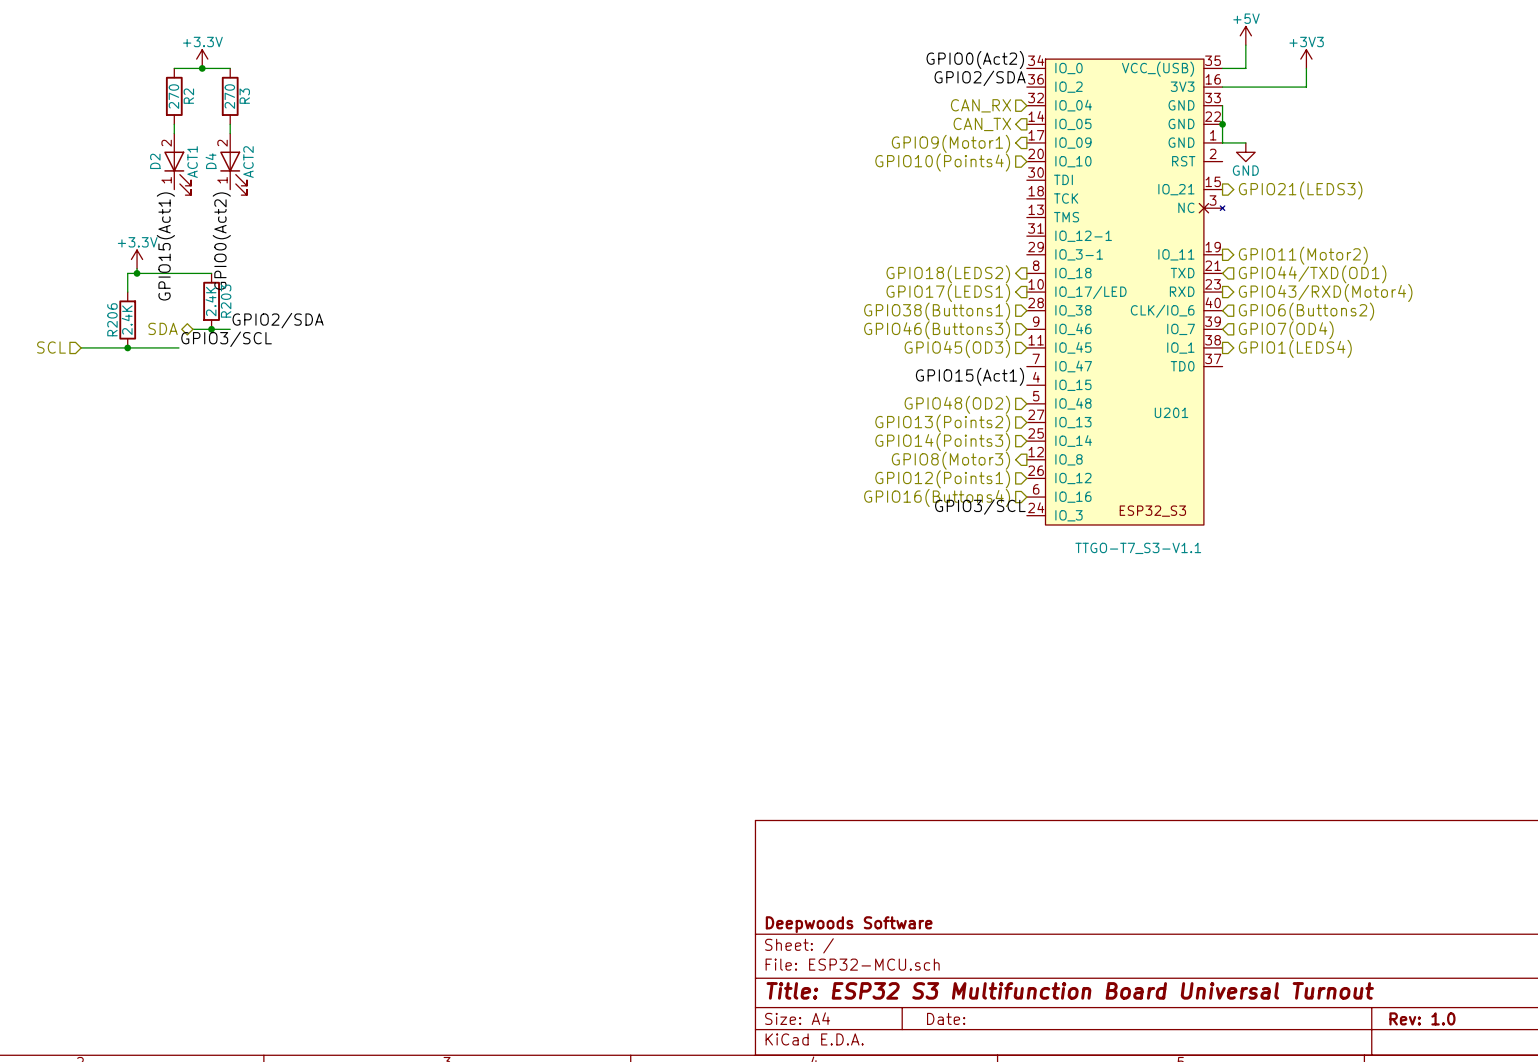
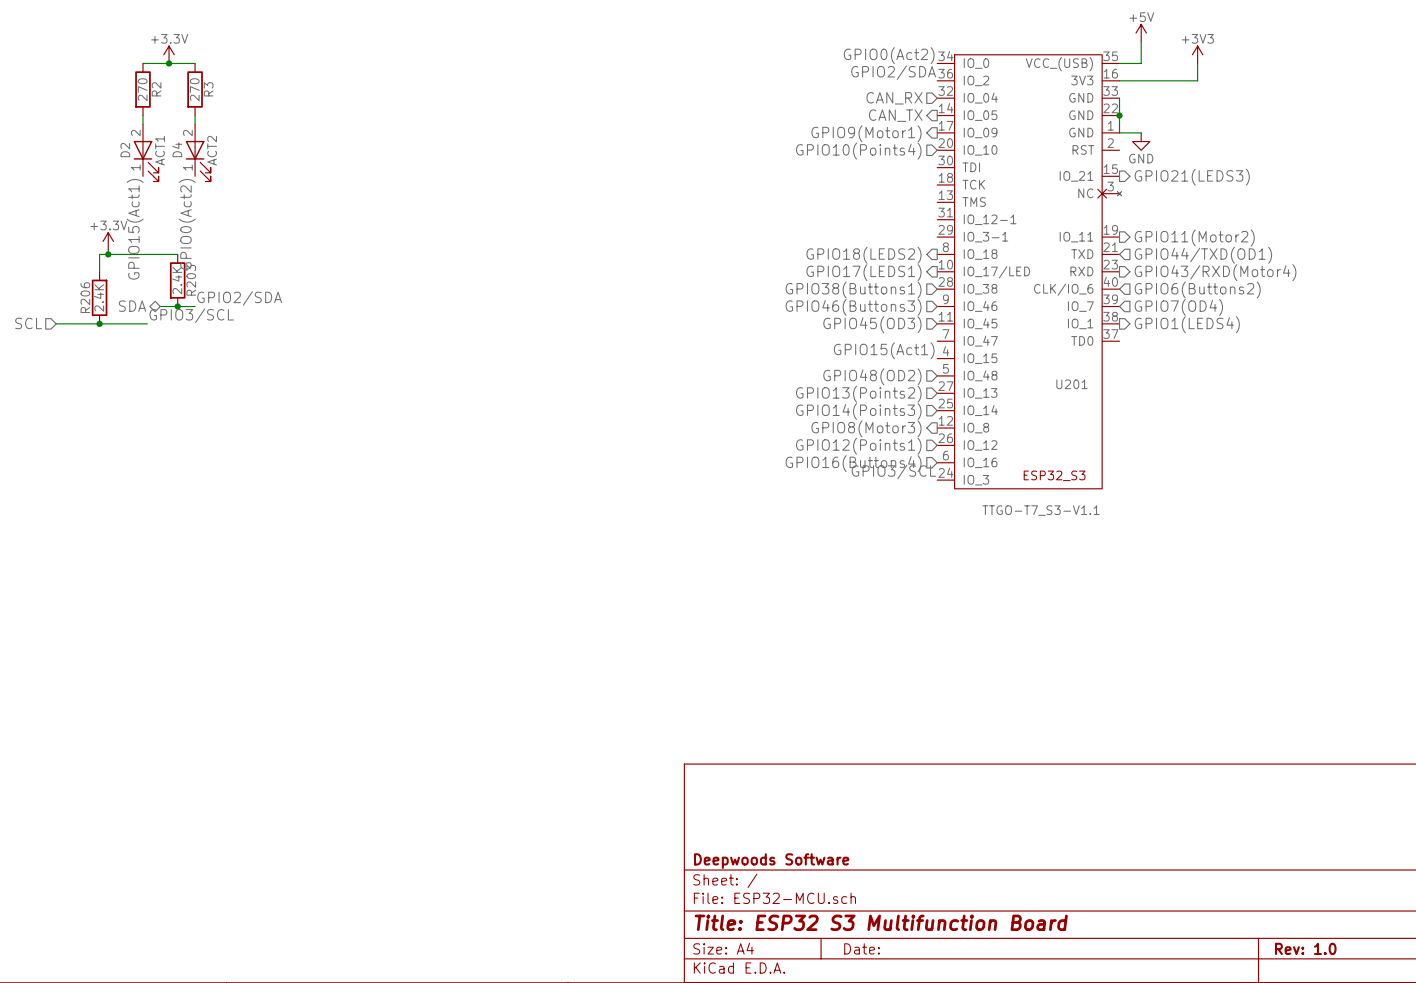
title block: Title: ESP32 S3 Multifunction Board Universal Turnout (1070, 990) -> Title: ESP32 S3 Multifunction Board (881, 922)

